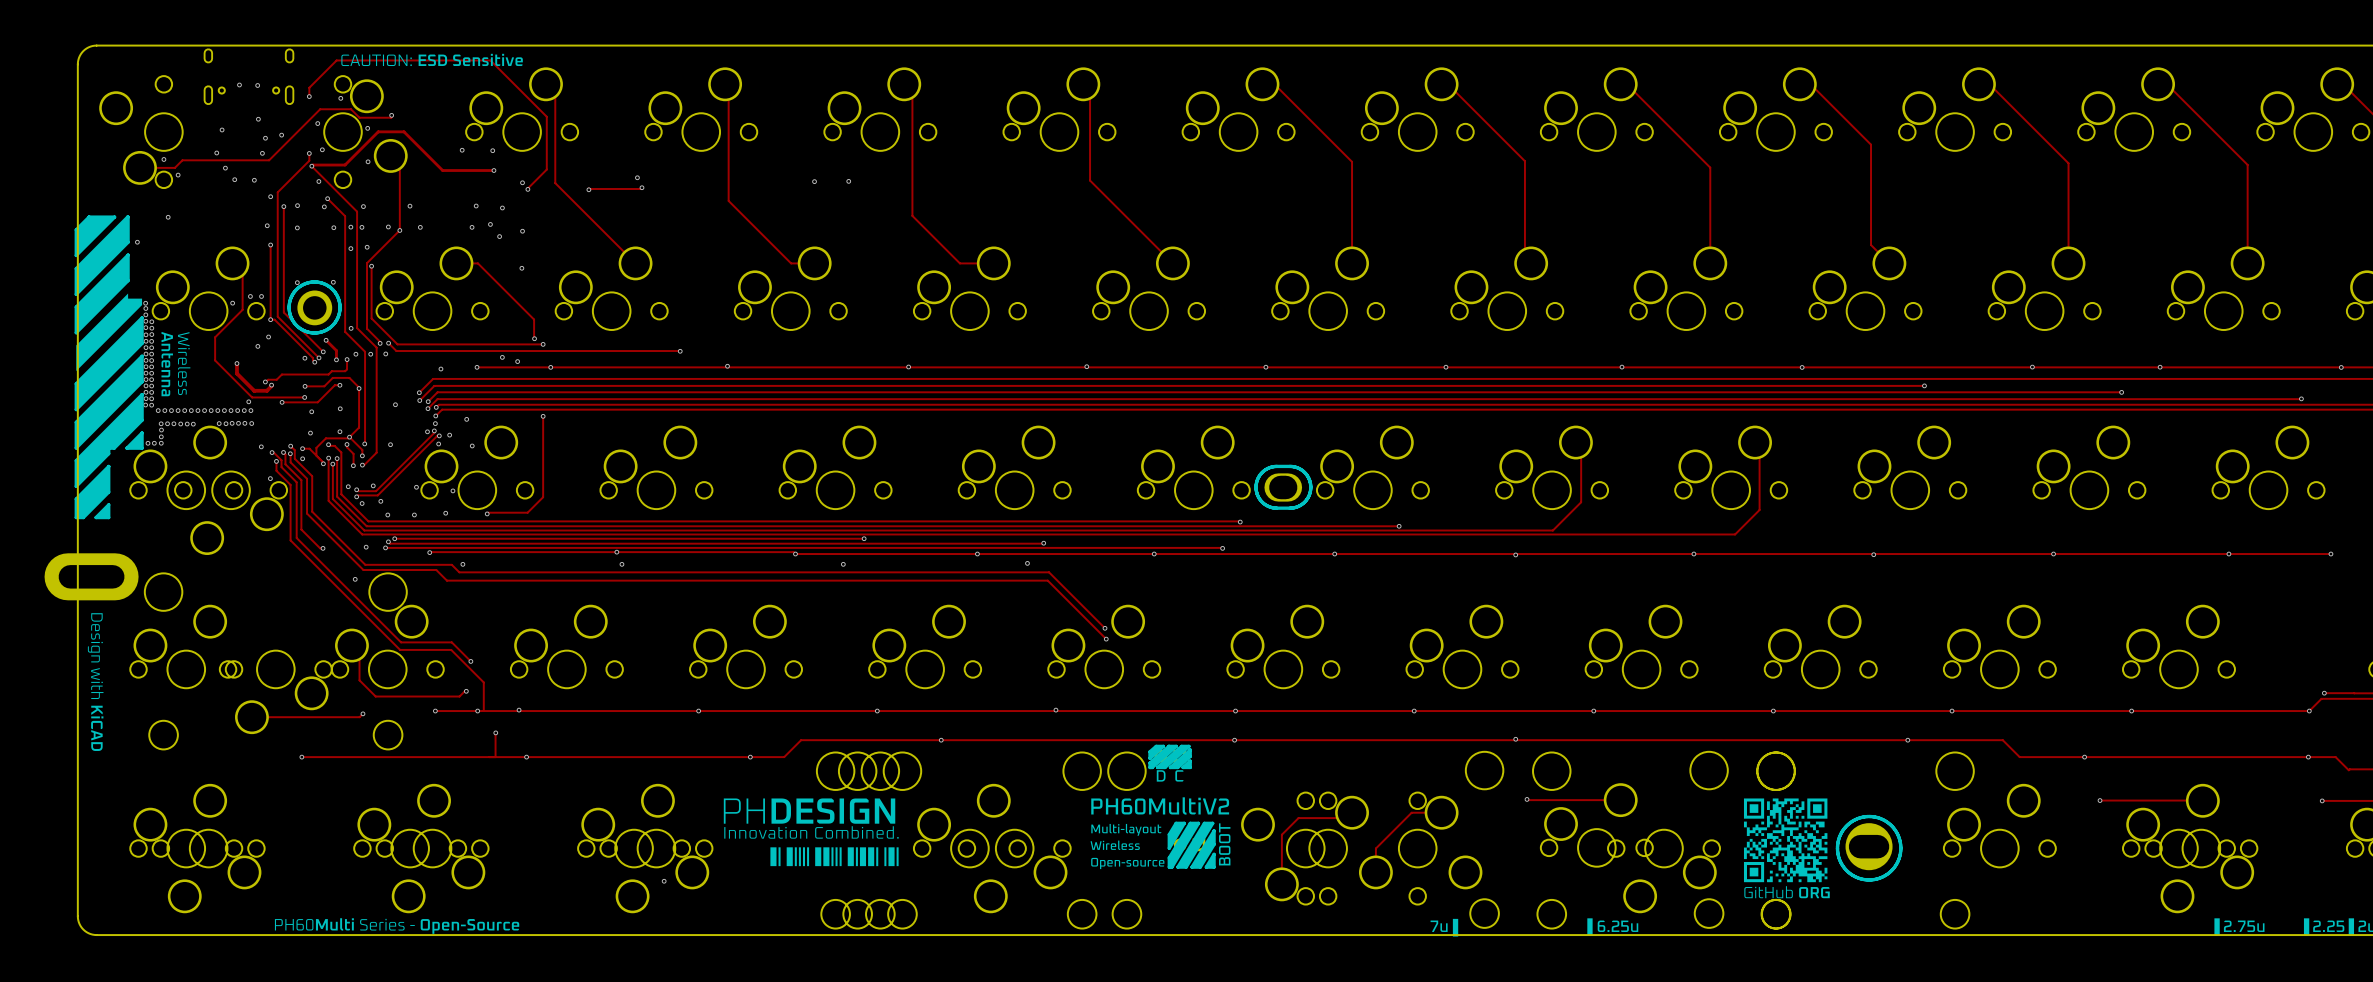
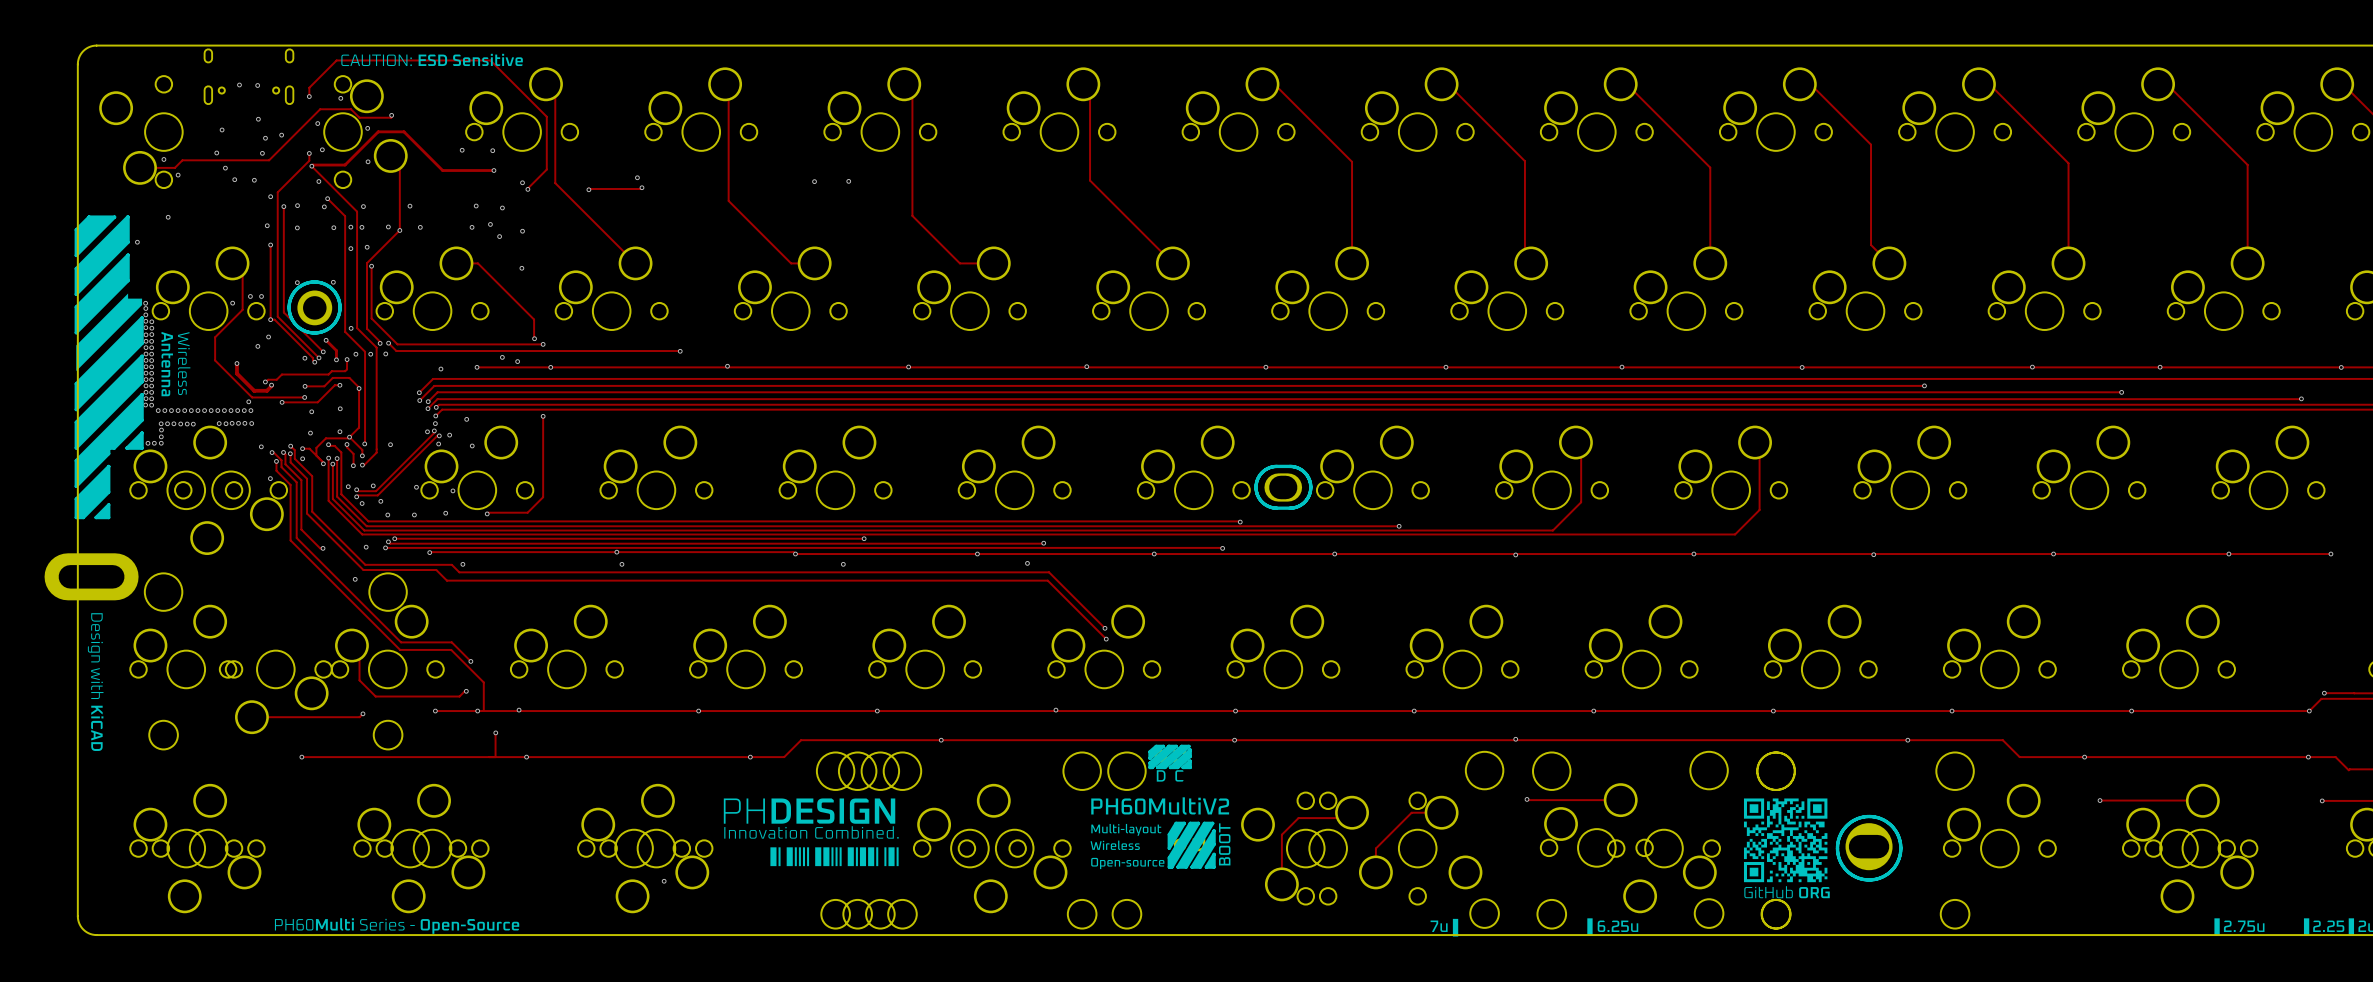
via: (395, 404) -> none

